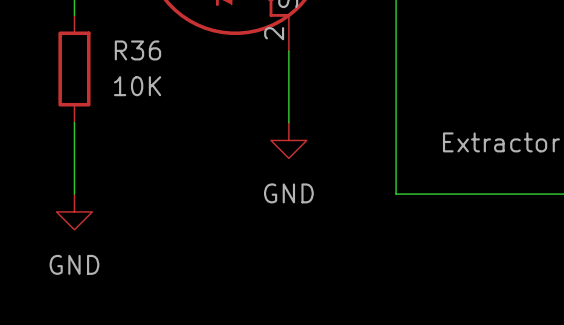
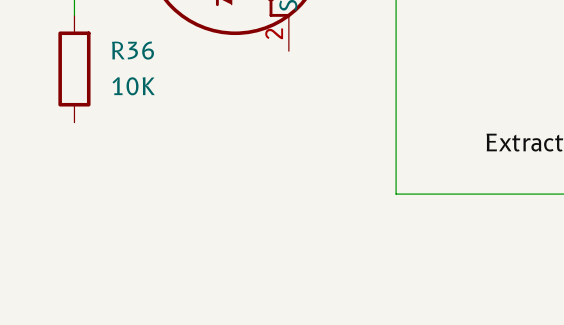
wire: (288, 51) (288, 122) -> none
wire: (74, 122) (74, 194) -> none
power symbol: GND (288, 140) -> none
power symbol: GND (74, 211) -> none

